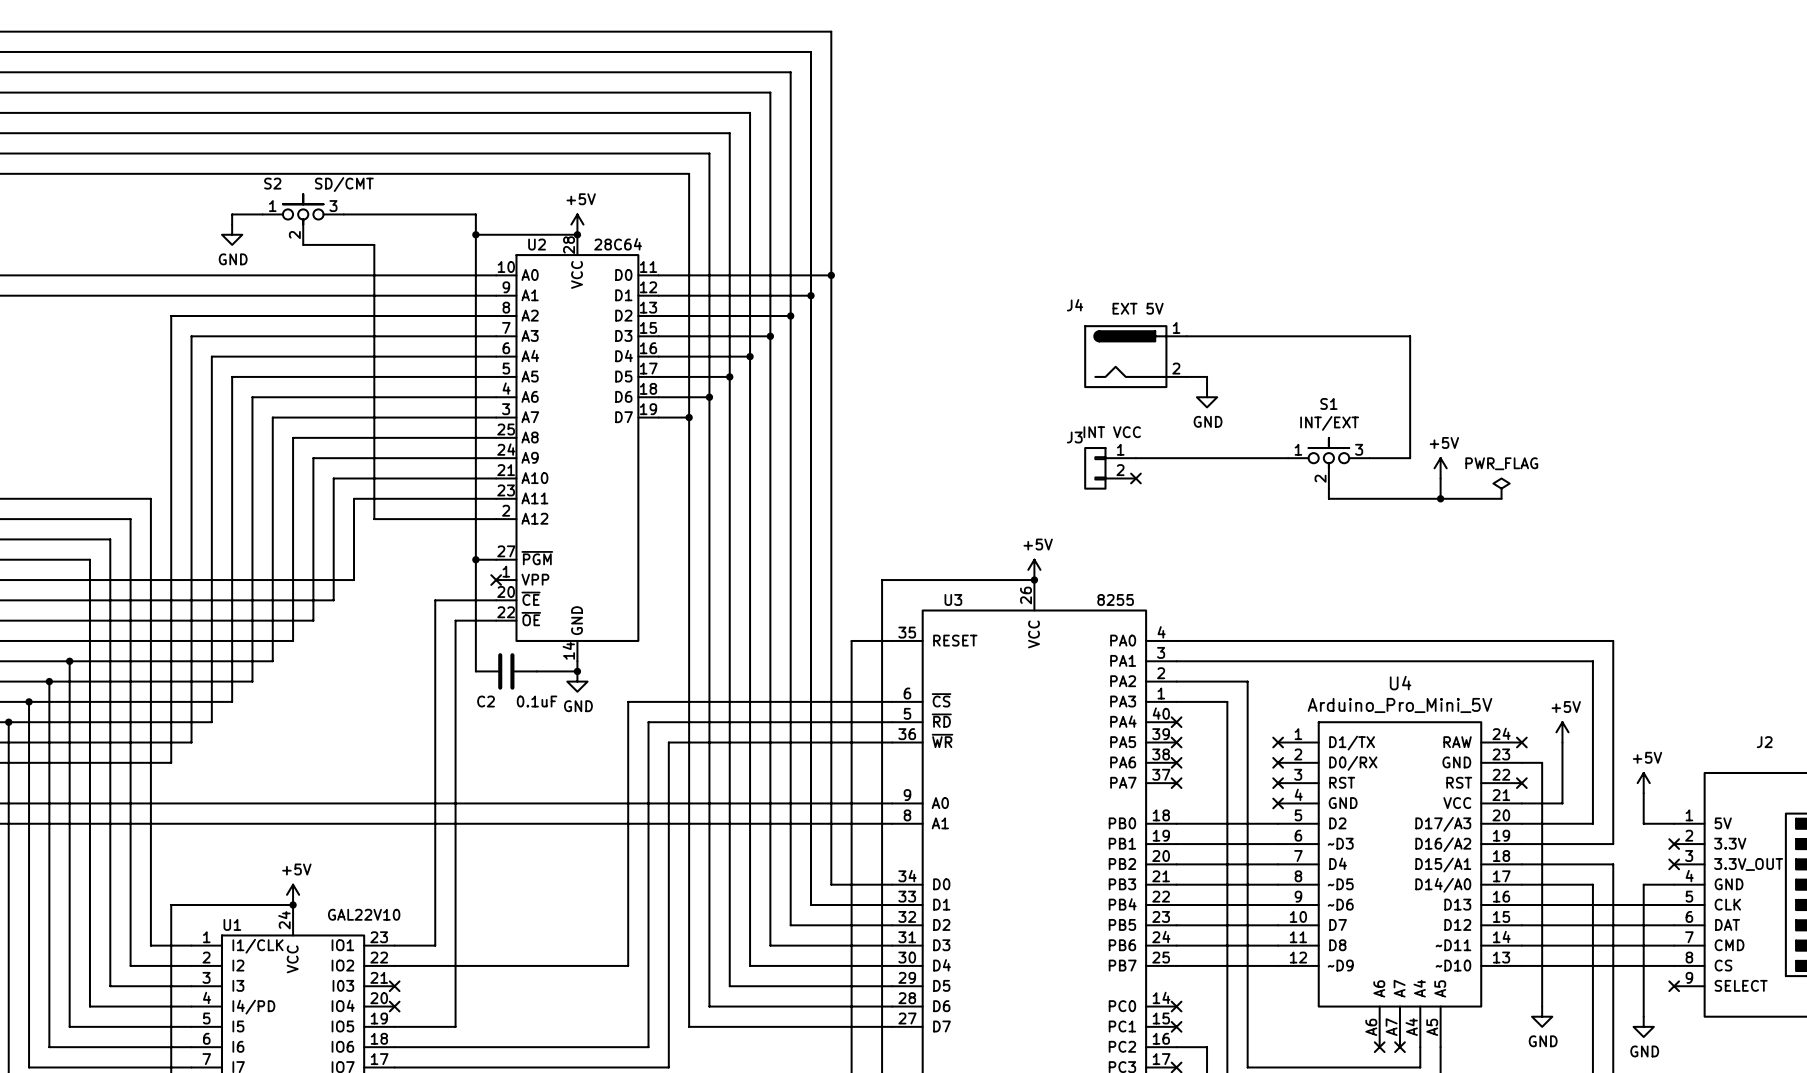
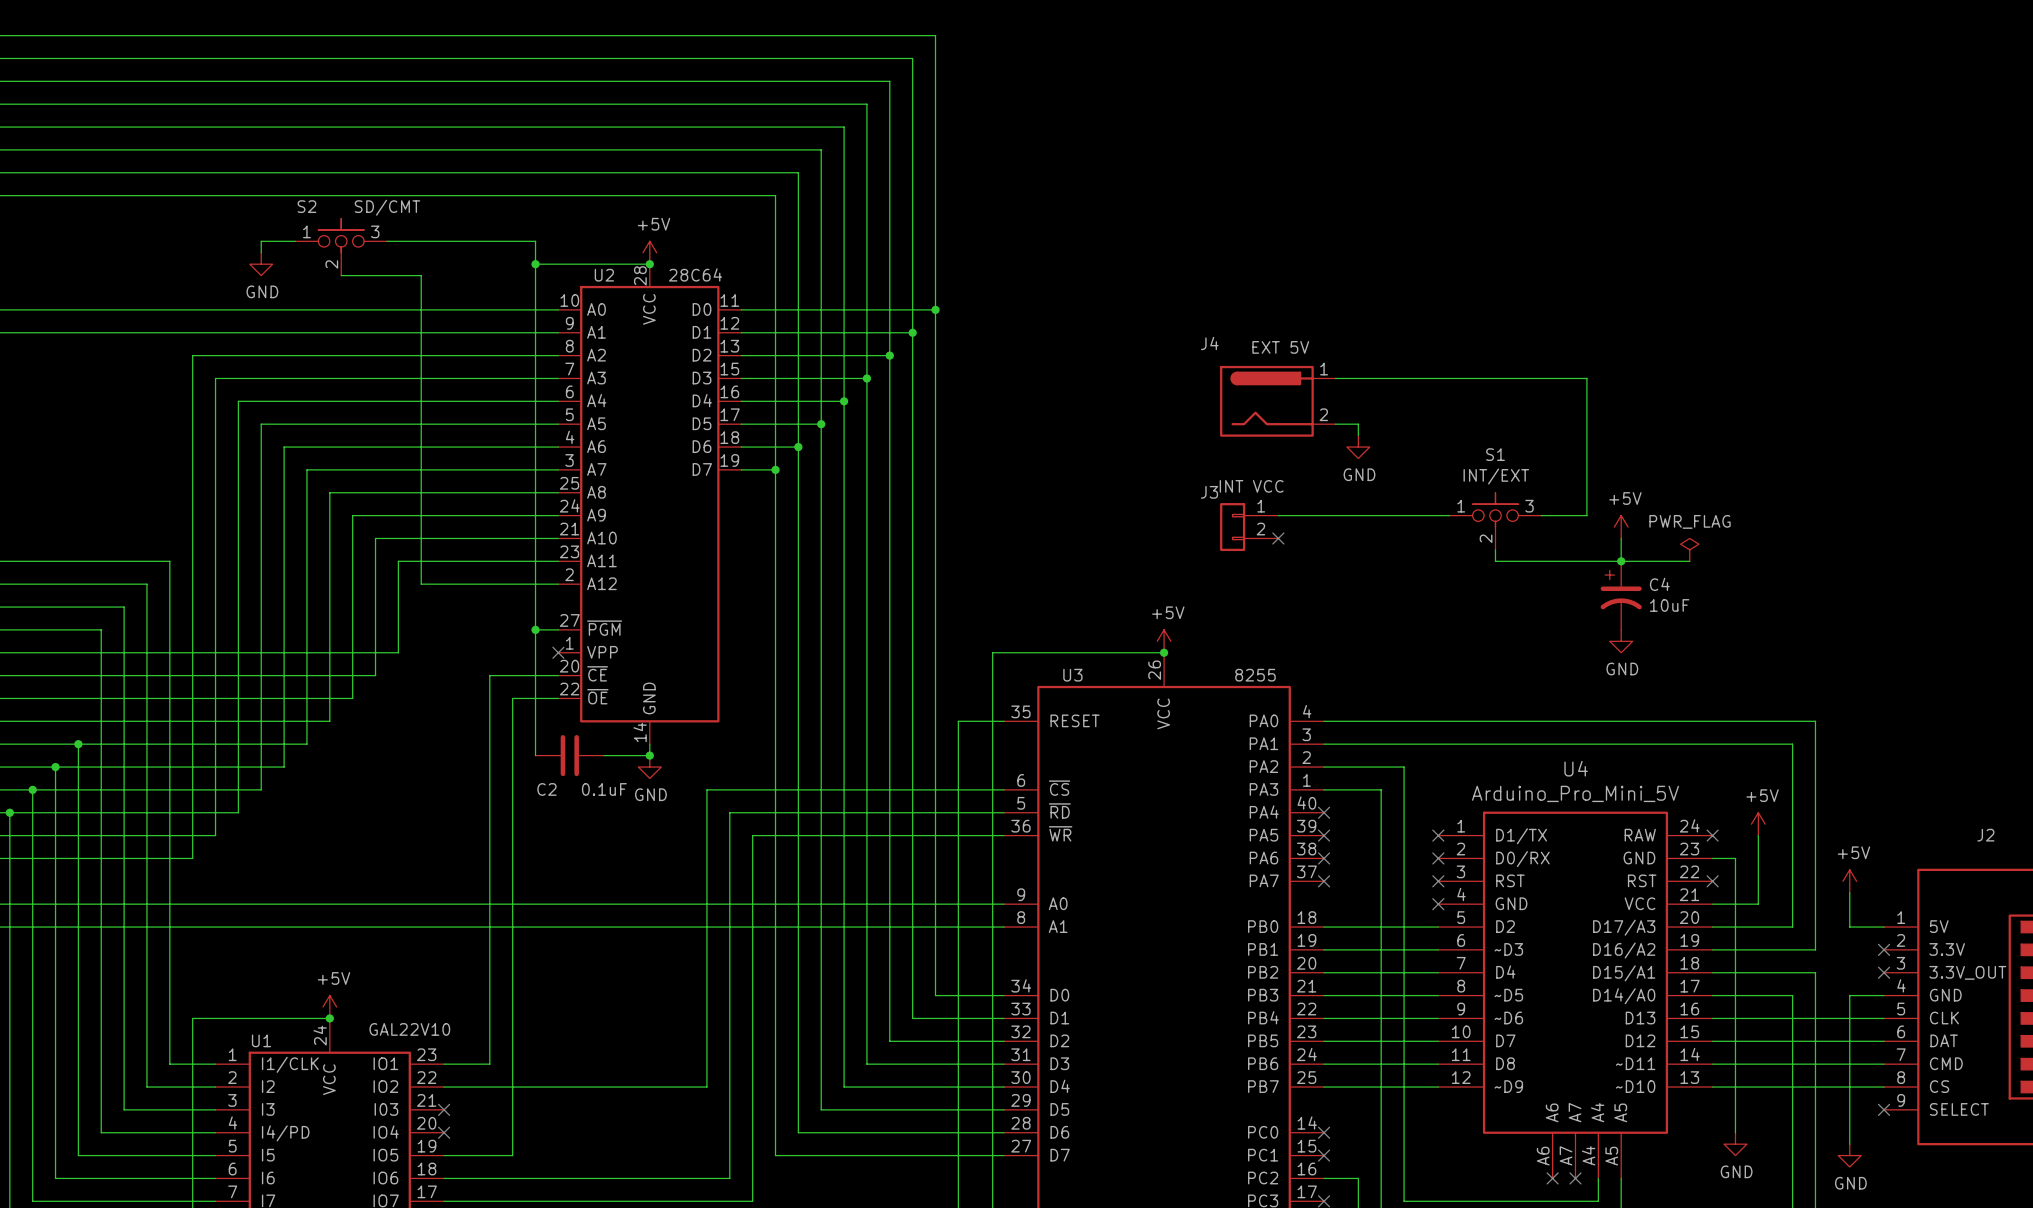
C4: none -> 10uF (1621, 595)
power symbol: none -> GND (1621, 641)

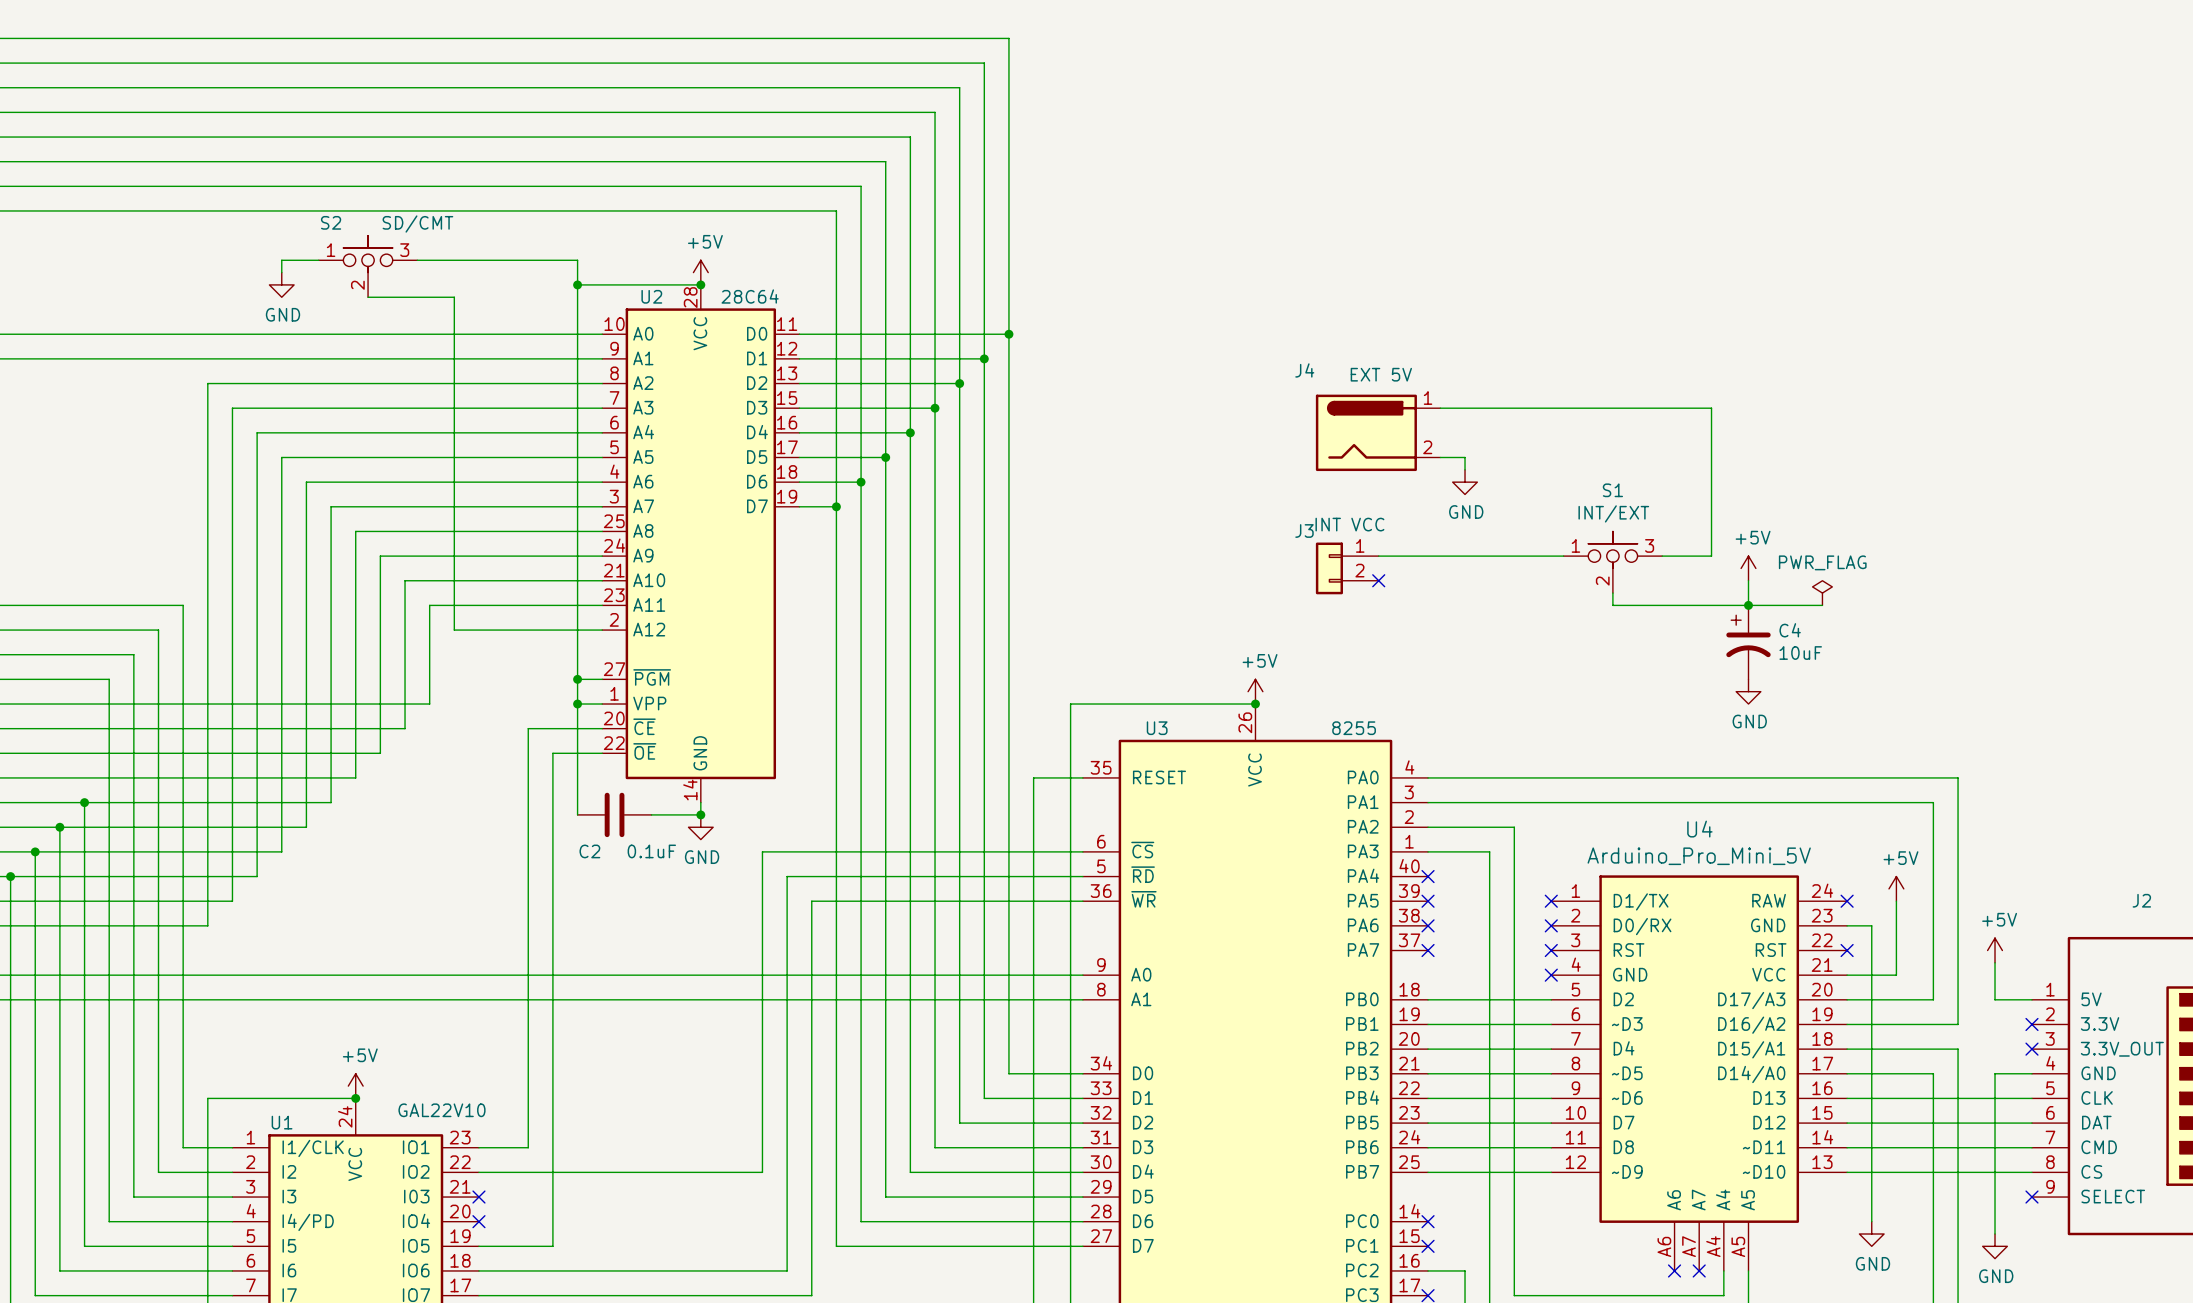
wire: none -> (577, 704) (602, 704)
junction: none -> (577, 704)
no-connect mark: (558, 652) -> none

